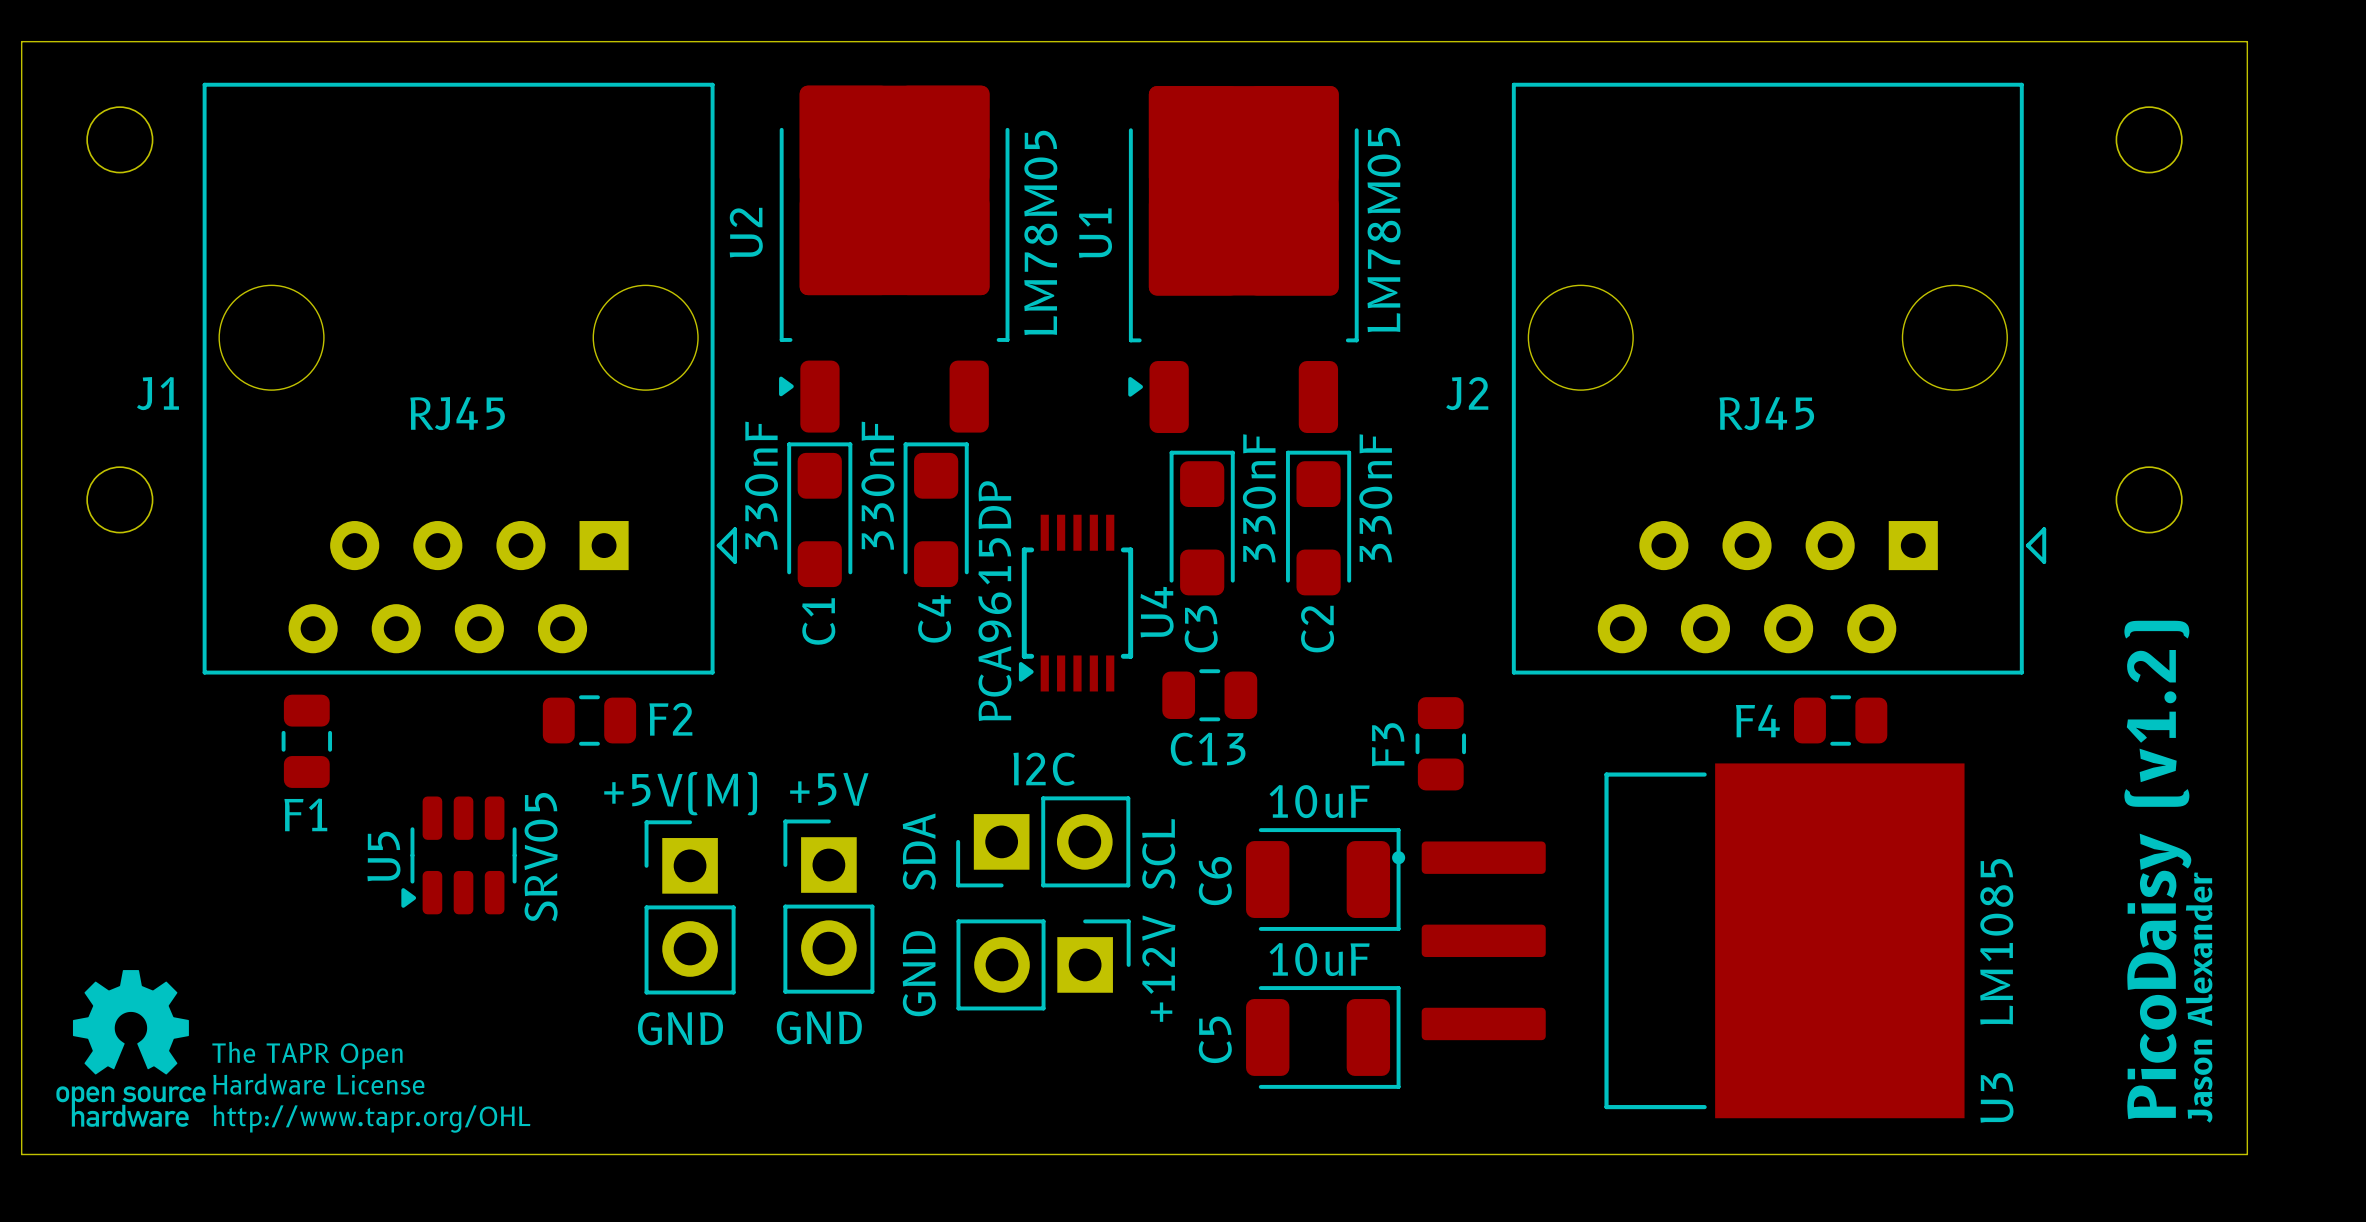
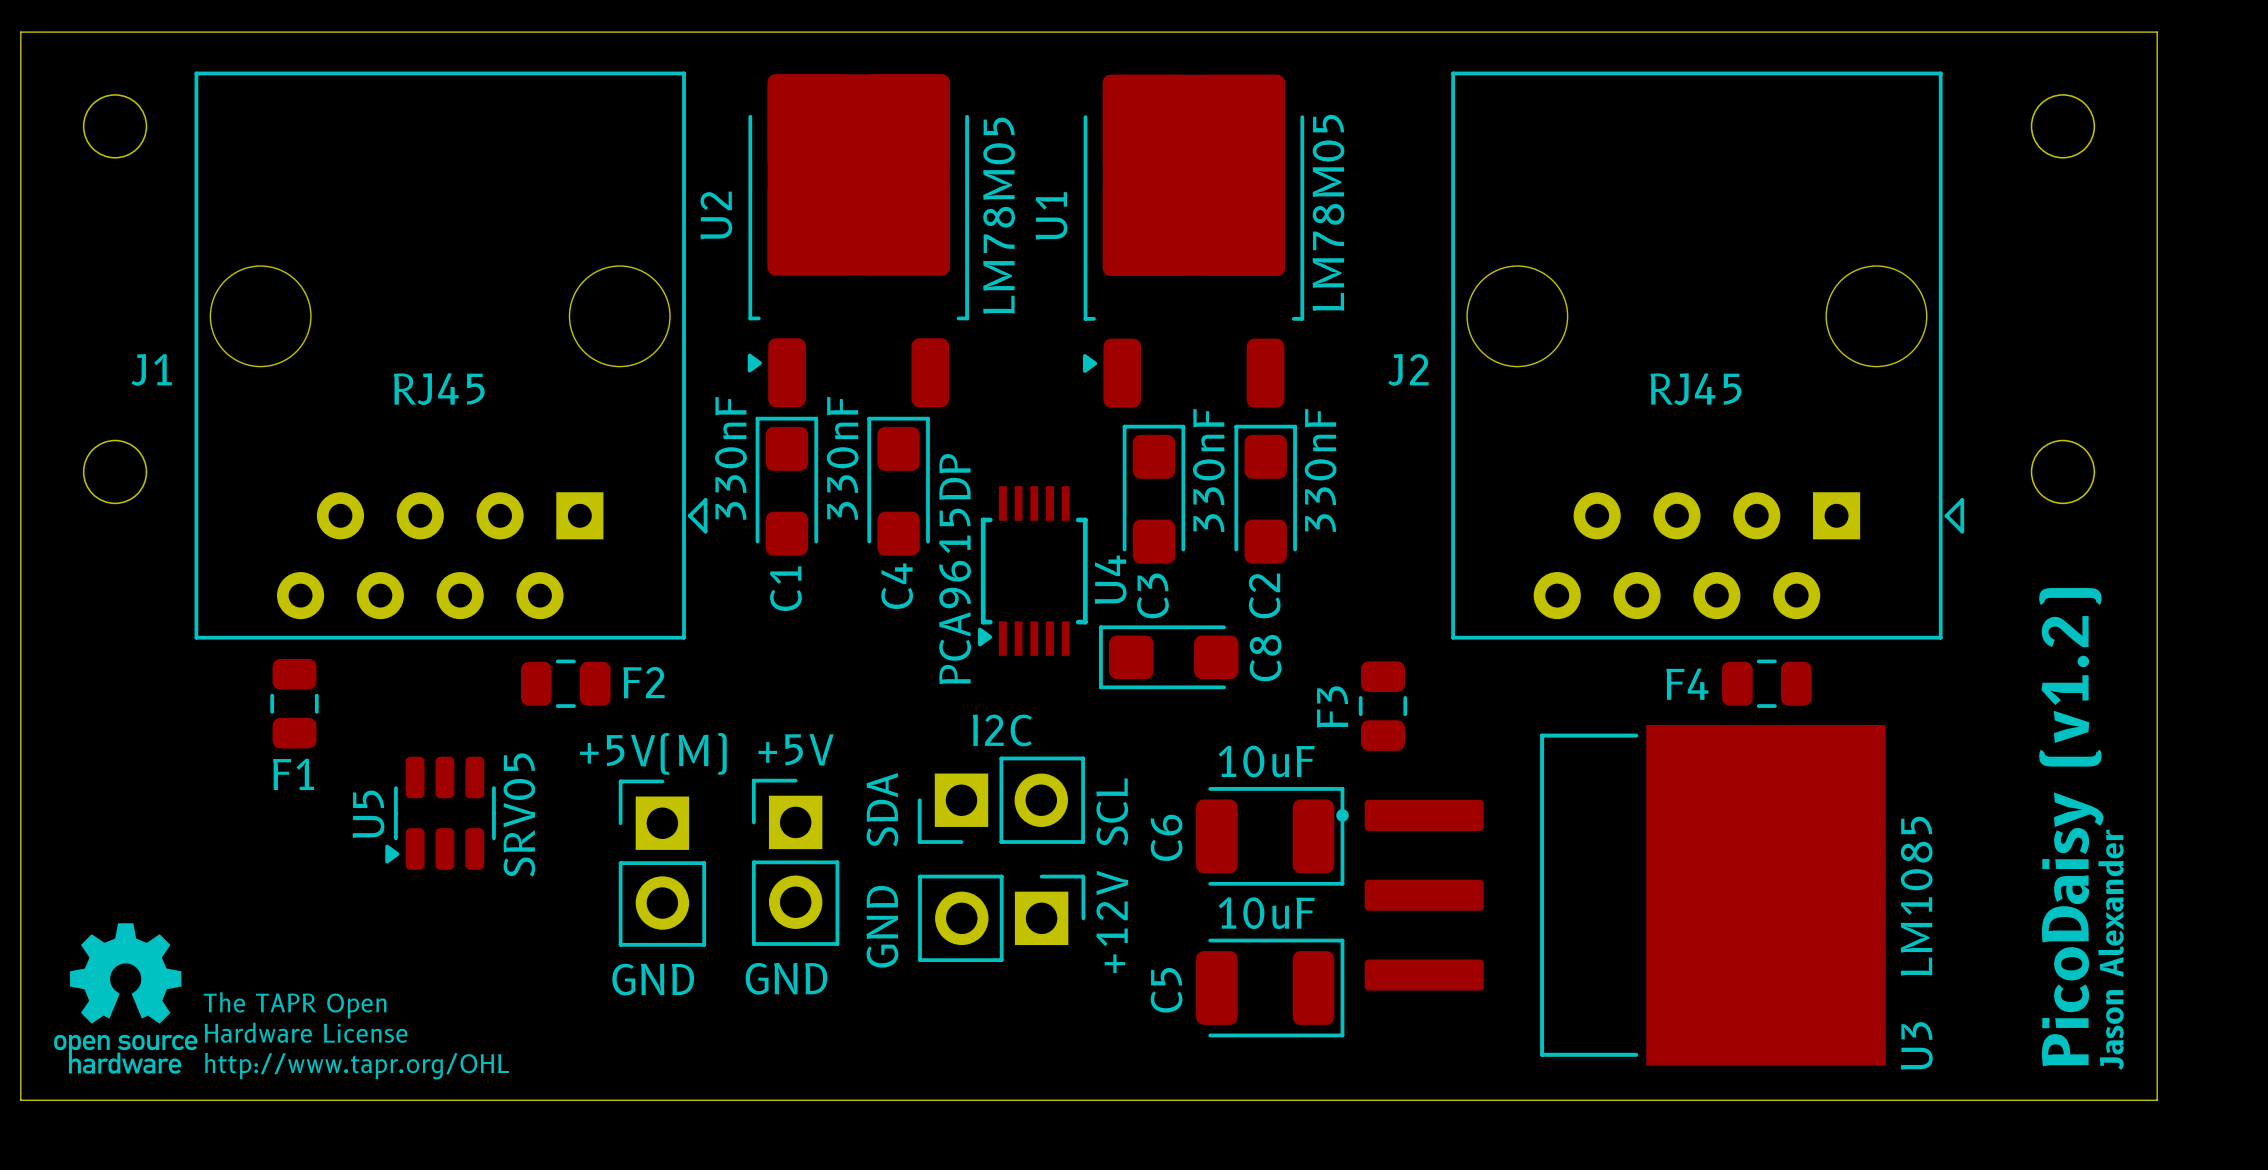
C8: none -> (1168, 657)
C13: (1209, 695) -> none

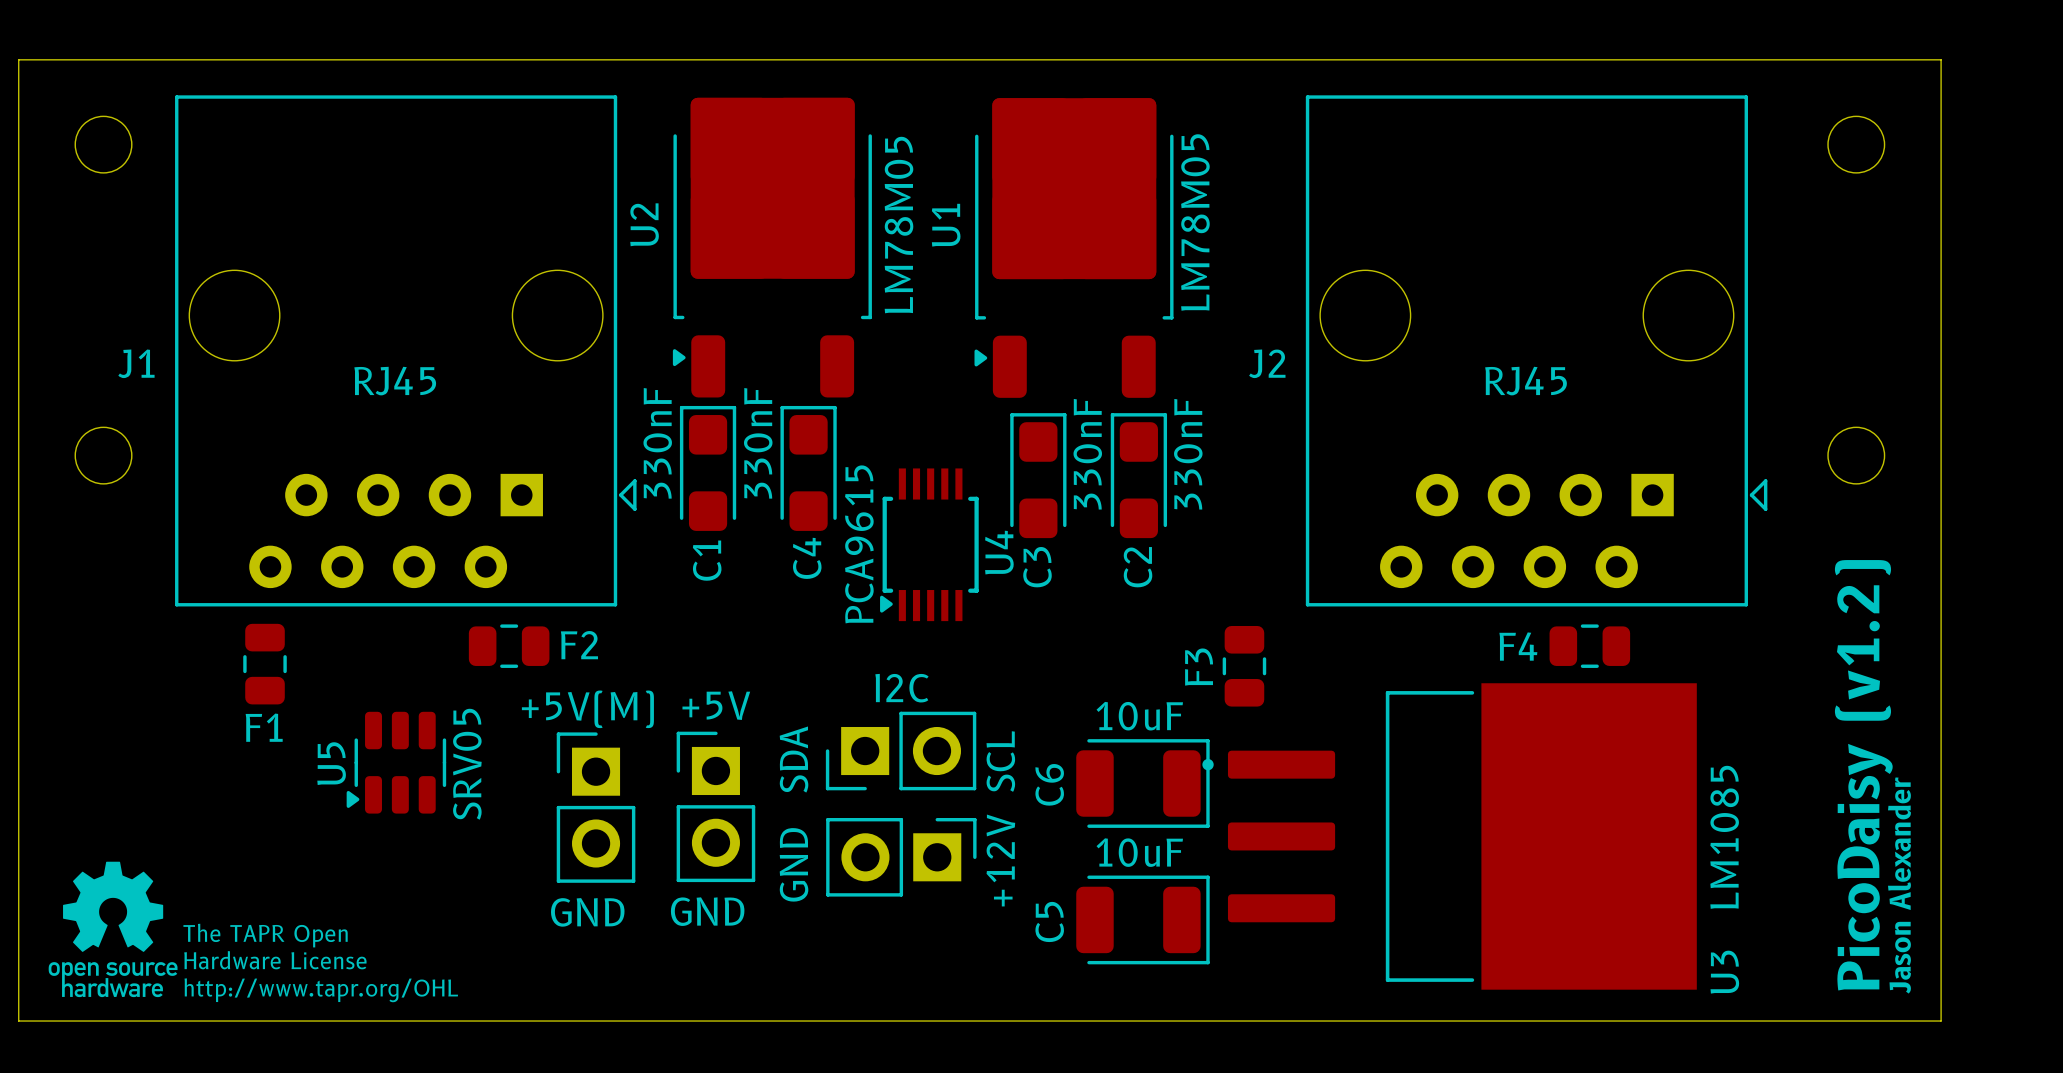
U4 value: PCA9615DP (955, 569) -> PCA9615 (859, 544)
C8: (1168, 657) -> none

